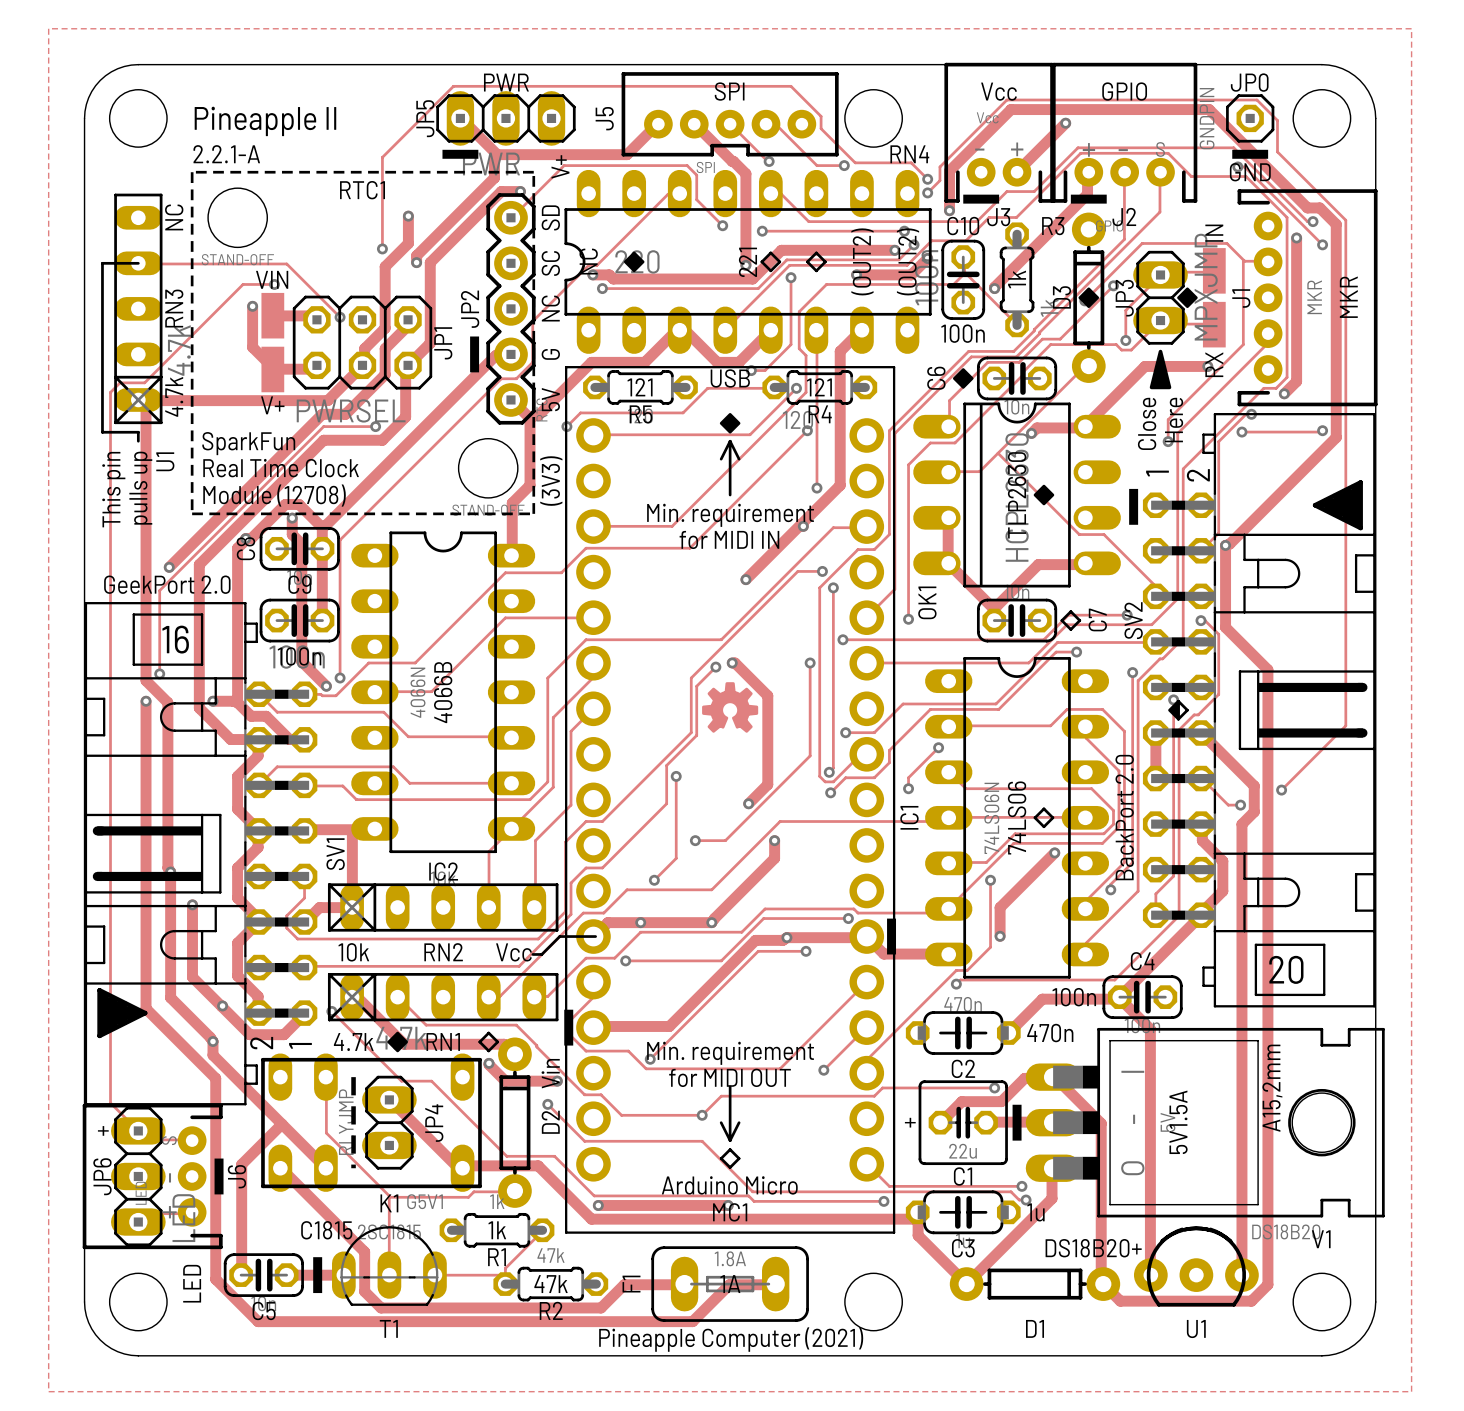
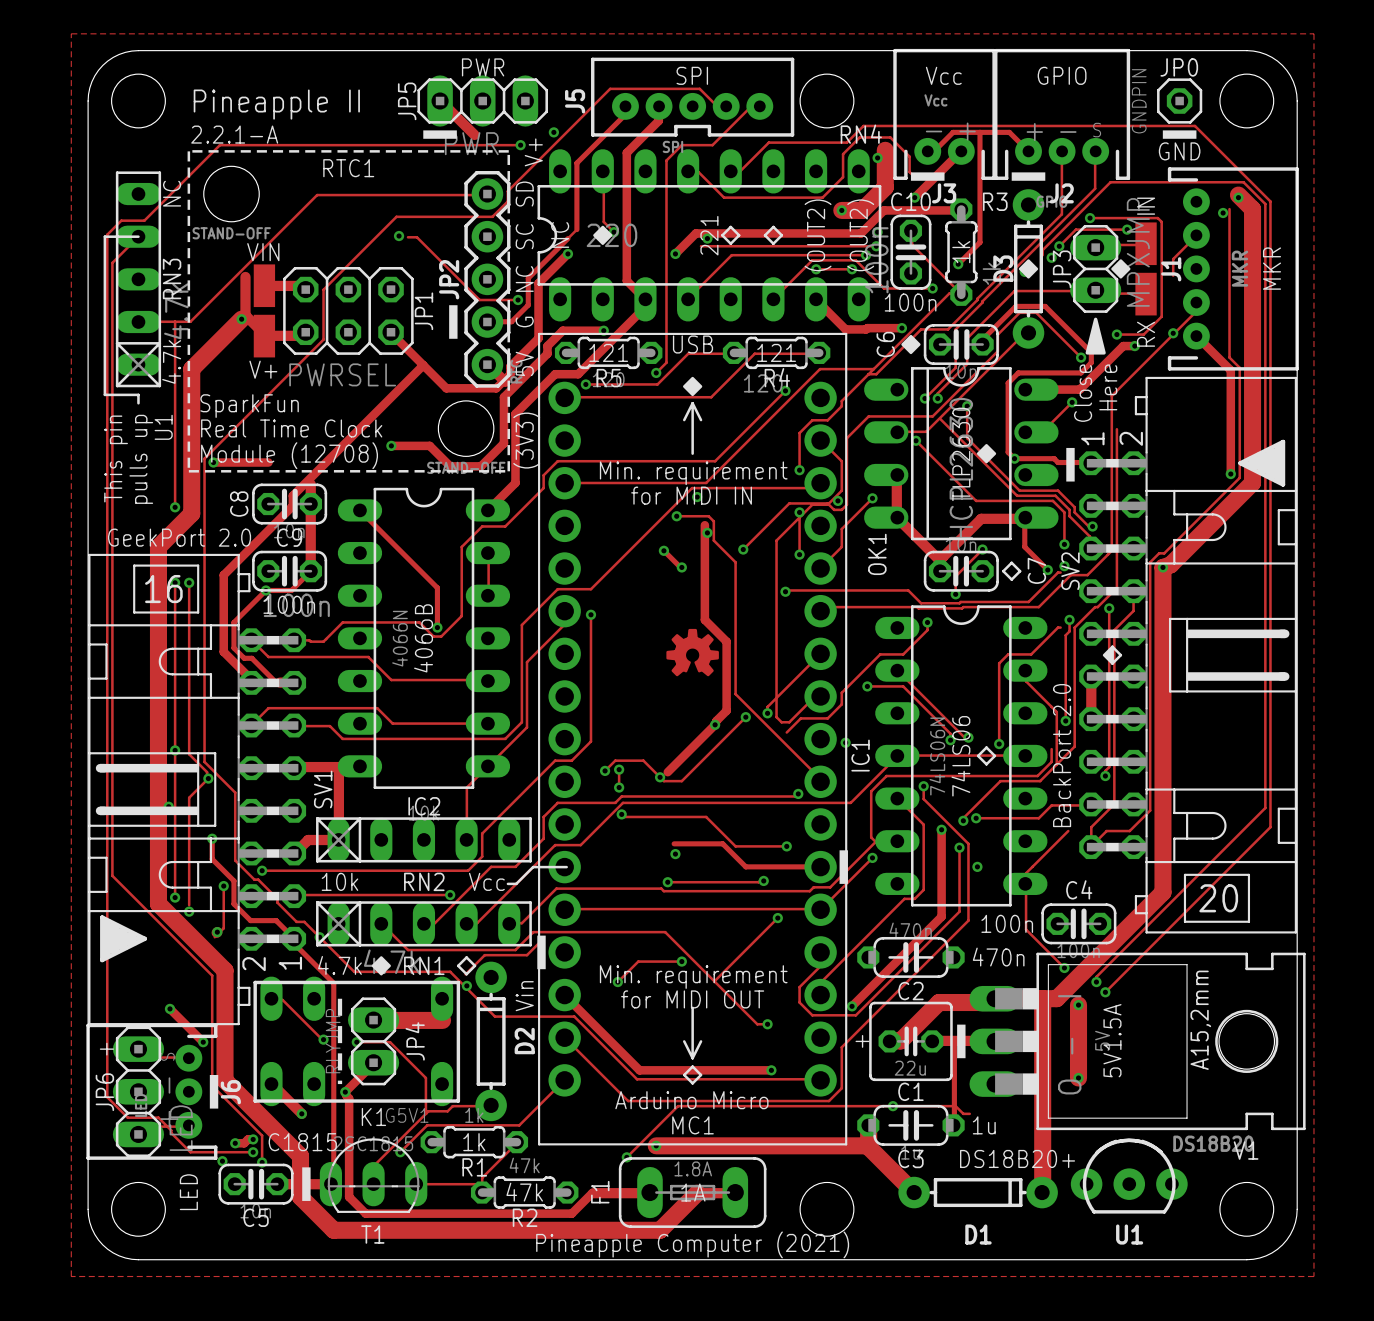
zone outline: (48, 28) (1411, 28) (1411, 1391) (48, 1391) (48, 28) -> (71, 33) (71, 1276) (1313, 1276) (1313, 33) (71, 33)
track: (1065, 123) (1017, 172) -> (914, 197) (961, 151)
via: (1065, 123) -> none
track: (657, 124) (627, 154) (497, 154) (494, 158) (494, 177) (416, 255) (416, 262) -> none
track: (694, 124) (745, 173) (745, 265) -> (659, 106) (658, 120) (626, 152) (626, 280) (645, 299) (643, 308) (578, 374) (555, 374) (552, 376)
track: (730, 124) (769, 161) -> none
track: (765, 124) (775, 124) (816, 165) (844, 165) -> (726, 106) (716, 105) (699, 88) (610, 88) (507, 191) (507, 201) (492, 216) (396, 216) (323, 289) (323, 339) (204, 458) (204, 761) (235, 792) (235, 860) (254, 879) (258, 879) (296, 921) (304, 921) (319, 937)
track: none -> (759, 106) (750, 106) (712, 145) (681, 145) (666, 160) (666, 362) (656, 372)
via: none -> (553, 132)
track: none -> (979, 132) (979, 242) (958, 264)
via: (769, 161) -> none
track: (855, 162) (821, 128) (821, 116) (791, 86) (453, 86) (382, 157) (382, 248) -> (809, 142) (768, 142) (740, 170) (730, 171)
track: (894, 162) (911, 162) (927, 179) -> (846, 142) (863, 125) (1194, 125) (1270, 201) (1270, 827) (1105, 992)
track: none -> (520, 145) (219, 145) (144, 220) (121, 220) (107, 234) (107, 1097) (127, 1117) (158, 1117) (190, 1152) (253, 1152)
via: none -> (520, 145)
via: (844, 165) -> none
track: (1237, 166) (1244, 166) (1322, 244) -> none
via: (1237, 166) -> none
track: none -> (885, 150) (885, 187) (862, 210) (841, 210)
track: (1088, 172) (1087, 194) (994, 288) -> (1028, 151) (1009, 132) (953, 132) (935, 150) (927, 151)
track: (520, 191) (501, 191) (430, 262) (430, 343) (408, 365) (405, 370) (405, 417) (382, 440) (323, 440) (199, 564) (199, 708) (230, 739) (259, 739) (258, 755) (237, 776) (237, 809) (259, 830) (258, 847) (237, 867) (237, 898) (256, 917) (259, 922) (237, 943) (237, 975) (258, 996) (259, 1013) -> none
via: (520, 191) -> none
track: (927, 192) (939, 180) (939, 166) (1006, 100) (1256, 100) (1277, 120) (1277, 151) (1345, 220) (1345, 725) (1281, 790) -> none
via: (927, 192) -> none
track: none -> (602, 171) (603, 221) (614, 232)
track: (679, 193) (668, 194) (606, 255) -> (624, 106) (624, 115) (576, 163) (576, 229)
track: (770, 193) (781, 194) (808, 221) -> (688, 171) (698, 172) (724, 197) (766, 197)
track: (949, 210) (949, 171) (1011, 109) (1209, 109) (1307, 207) (1319, 207) (1336, 224) (1336, 437) (1229, 544) (1225, 545) (1225, 627) (1267, 669) (1267, 1284) (1251, 1301) (1120, 1301) (1103, 1284) (1101, 1279) (1101, 1123) (1053, 1077) (1024, 1078) (1001, 1101) (961, 1101) (941, 1122) -> none
via position: (949, 210) -> (914, 197)
track: (408, 216) (408, 243) (385, 266) (385, 328) (364, 348) (364, 361) (361, 366) (327, 400) (138, 399) (146, 404) (146, 680) (167, 702) (167, 867) (170, 872) (170, 997) (210, 1037) (212, 1041) (212, 1055) (325, 1168) -> none
via: (408, 216) -> none
track: (510, 217) (564, 165) (687, 165) (696, 175) (696, 199) (722, 225) -> (487, 194) (317, 195) (190, 321) (138, 322)
track: none -> (1238, 195) (1252, 209) (1252, 482) (1170, 564) (1162, 567) (1162, 892) (1056, 998) (995, 998)
track: (868, 221) (976, 221) (1006, 191) (1034, 191) (1077, 147) (1233, 147) (1307, 221) (1313, 221) -> (822, 197) (843, 177) (843, 154) (859, 137) (890, 137) (909, 156) (909, 172) (916, 178)
via: (722, 225) -> none
track: (762, 231) (904, 231) -> none
via: (762, 231) -> none
via: (904, 231) -> none
via: none -> (841, 210)
track: (1296, 238) (1296, 381) (1284, 393) -> none
track: (1154, 243) (1142, 243) (1084, 300) -> none
via: none -> (1090, 218)
track: (914, 244) (898, 259) -> (961, 209) (884, 210) (860, 233) (850, 233)
via: (914, 244) -> none
via: (1322, 244) -> none
track: (1231, 247) (1244, 261) (1268, 261) -> (1161, 221) (1161, 316) (1143, 334) (1116, 334)
via: (382, 248) -> none
track: (894, 250) (781, 250) (752, 279) (613, 279) (609, 274) (592, 274) -> none
via: (894, 250) -> none
track: none -> (1127, 229) (1075, 229) (1059, 246)
via: none -> (1127, 229)
via: none -> (614, 232)
track: (927, 258) (911, 274) (856, 274) -> none
track: (786, 259) (758, 288) (602, 288) -> (745, 233) (695, 233) (675, 253)
track width: thin (786, 259) (898, 259) -> thick (745, 233) (850, 233)
track: (1244, 260) (1243, 287) -> (1196, 235) (1173, 259)
track: (138, 263) (286, 263) (340, 317) -> none
track: none -> (408, 237) (416, 237) (479, 300) (518, 300)
track: (596, 265) (588, 265) (532, 321) (532, 362) (516, 378) (501, 378) (340, 540) (340, 678) -> (567, 238) (528, 278) (528, 305) (511, 321) (487, 322)
track: (965, 272) (953, 284) (826, 284) (799, 311) (799, 348) (806, 355) (806, 392) (672, 526) -> (873, 369) (820, 369) (706, 482) (638, 482)
track: none -> (701, 246) (876, 246)
via: none -> (876, 246)
via: none -> (1059, 246)
via: (592, 274) -> none
via position: (856, 274) -> (816, 269)
track: (1160, 274) (1125, 310) (1125, 340) -> none
track: (791, 277) (791, 344) (765, 370) (751, 370) -> none
via: (791, 277) -> none
track: none -> (567, 253) (538, 283) (538, 338) (510, 366) (510, 374) (496, 388) (446, 388) (391, 332)
via: none -> (567, 253)
via: none -> (675, 253)
track: (771, 283) (789, 265) (907, 265) (931, 240) (965, 240) (989, 217) (1016, 217) (1080, 153) (1168, 153) (1191, 176) (1246, 176) (1287, 217) (1287, 377) (1276, 388) (1263, 388) (1183, 468) -> (731, 255) (866, 255)
via: none -> (866, 255)
track: none -> (1042, 255) (1042, 250) (1110, 182) (1243, 182) (1265, 204) (1265, 808) (1096, 976) (1096, 982)
track: (274, 284) (243, 284) (144, 382) (120, 382) (110, 392) -> (138, 236) (112, 262) (112, 357)
via: (274, 284) -> none
track: (1113, 285) (1060, 339) (1042, 339) (1019, 362) (1002, 362) -> (958, 319) (948, 329)
via: (602, 288) -> none
via: (994, 288) -> none
via: none -> (958, 264)
track: none -> (816, 269) (852, 269)
via: none -> (852, 269)
track: (1243, 304) (1243, 344) (1168, 419) (1168, 441) -> none
via: (252, 306) -> none
via: (340, 317) -> none
via: none -> (932, 288)
track: (407, 320) (407, 326) (385, 348) (385, 374) (345, 414) (322, 414) (169, 567) -> none
track: (1159, 321) (1131, 350) (1121, 350) (1116, 344) (1097, 344) -> (1095, 291) (1014, 291) (992, 312)
via: none -> (518, 300)
track: (770, 330) (739, 362) (717, 362) (685, 330) (679, 330) (674, 332) (644, 362) (591, 362) (538, 415) (530, 418) (530, 485) (512, 503) (512, 555) -> none
track: (816, 330) (816, 488) -> (773, 299) (812, 260) (855, 260) (884, 288) (932, 288)
track: (861, 330) (840, 351) (840, 485) (745, 579) -> (816, 299) (845, 329) (901, 328)
via: (1125, 340) -> none
track: (1050, 344) (1079, 344) -> none
track: none -> (1036, 312) (1081, 357)
via: none -> (241, 319)
track: (1013, 351) (968, 351) (889, 430) (889, 438) -> (846, 395) (841, 401)
track: none -> (175, 321) (175, 507)
track: (510, 354) (495, 355) (326, 524) (322, 527) (299, 504) (285, 504) (251, 538) (245, 538) (237, 548) (237, 702) -> none
track: (971, 356) (1016, 356) -> (918, 324) (949, 293) (961, 294)
track: none -> (960, 324) (955, 329) (955, 367) (924, 398)
via: none -> (901, 328)
track: (987, 362) (949, 400) (948, 426) -> (933, 329) (921, 329) (876, 374) (868, 374)
track: none -> (603, 330) (562, 330) (547, 346) (547, 353) (503, 397) (503, 443) (480, 466) (450, 466) (429, 445) (391, 445)
via: none -> (603, 330)
track: (1207, 366) (1144, 366) (1084, 427) (1036, 427) (1031, 433) -> none
via: (1207, 366) -> none
via: none -> (1173, 333)
via: none -> (1116, 334)
track: none -> (1196, 336) (1230, 370) (1230, 474)
via: (751, 370) -> none
track: (1023, 374) (955, 442) (930, 442) (918, 455) -> (1019, 312) (997, 334) (997, 351) (932, 416) (868, 416)
track: none -> (967, 340) (967, 363) (937, 393) (937, 398)
track: none -> (982, 344) (983, 338) (1015, 306) (1045, 306) (1091, 352) (1091, 362) (1081, 372) (1018, 372) (1008, 383) (1008, 452) (1014, 458) (1054, 458) (1058, 462) (1091, 463)
track: none -> (1134, 346) (1123, 346) (1079, 389) (1025, 389)
via: none -> (1134, 346)
track: none -> (819, 352) (754, 353)
track: (725, 388) (707, 388) (683, 412) (580, 412) -> (688, 353) (657, 384) (585, 384)
via: (796, 388) -> none
via: none -> (1081, 357)
via: (1284, 393) -> none
track: none -> (423, 365) (292, 495) (292, 506) (223, 575) (223, 651) (250, 678) (251, 682)
via: none -> (656, 372)
track width: thin (580, 412) (566, 426) -> thick (552, 376) (539, 389)
track: (1251, 414) (1246, 414) (1218, 441) (1218, 533) (1201, 550) -> none
via: (1251, 414) -> none
via: none -> (585, 384)
track: (375, 426) (323, 426) (159, 590) (159, 594) -> (241, 319) (191, 369) (191, 513) (158, 546)
via: (375, 426) -> none
track: none -> (539, 389) (515, 413) (515, 482) (487, 510)
via: (566, 426) -> none
track: (807, 430) (689, 548) (586, 548) (561, 572) (530, 572) -> (785, 390) (715, 461) (557, 461) (543, 475) (543, 488) (505, 526)
via position: (807, 430) -> (785, 390)
track: (1322, 430) (1241, 432) -> none
via: (1322, 430) -> none
via: (1241, 432) -> none
track: (894, 433) (894, 478) -> (859, 425) (846, 438)
via position: (1031, 433) -> (967, 406)
via: none -> (924, 398)
via: none -> (937, 398)
track: none -> (1072, 402) (1042, 431) (1025, 432)
via: none -> (1072, 402)
via: (1168, 441) -> none
track: (889, 444) (889, 503) -> (820, 440) (841, 461)
track: none -> (841, 406) (827, 420) (812, 420) (799, 433) (799, 470)
track: (998, 453) (1023, 478) -> (967, 406) (967, 438)
track: none -> (940, 419) (1017, 495) (1055, 495) (1069, 509) (1069, 516) (1090, 538)
track: (908, 464) (908, 619) -> none
track: none -> (916, 440) (976, 500) (1052, 500)
via: none -> (916, 440)
via: none -> (391, 445)
via: (816, 488) -> none
via: none -> (1014, 458)
track: none -> (213, 462) (268, 462)
via: none -> (213, 462)
via: none -> (799, 470)
via: none -> (1230, 474)
track: (292, 518) (292, 534) (301, 544) (301, 661) (326, 686) -> none
via: (292, 518) -> none
via: (803, 526) -> none
track: (866, 527) (833, 527) (721, 639) (621, 639) -> (820, 484) (816, 488) (692, 488) (590, 589)
track: (1103, 534) (1114, 545) -> (1042, 490) (1058, 490) (1074, 507) (1074, 512) (1088, 526) (1092, 526)
via: (245, 538) -> none
via: none -> (697, 497)
via: none -> (872, 498)
via: none -> (837, 500)
via: (1225, 545) -> none
track: (894, 549) (894, 589) (889, 594) -> (872, 498) (841, 529) (841, 546)
track: none -> (846, 504) (841, 509) (834, 509) (827, 503) (789, 503) (743, 549)
track: none -> (359, 510) (437, 587) (437, 627)
track: none -> (799, 512) (799, 554)
via: none -> (799, 512)
track: (1127, 557) (1154, 585) -> (1064, 512) (1064, 544)
track: none -> (676, 516) (708, 516) (713, 521) (713, 540) (735, 562) (735, 694) (820, 778) (820, 781)
via: none -> (676, 516)
track: none -> (1025, 517) (1024, 546) (1047, 570)
via position: (169, 567) -> (175, 507)
track: none -> (704, 525) (704, 619) (726, 641) (726, 710) (667, 772)
track: (822, 571) (797, 571) (691, 678) (691, 732) (621, 802) -> (590, 614) (590, 741)
via: (822, 571) -> none
via: none -> (1092, 526)
track: (833, 587) (833, 768) (829, 772) -> none
via: (833, 587) -> none
via: none -> (1064, 544)
track width: thin (159, 594) (159, 673) -> thick (158, 546) (158, 621)
track: (483, 594) (415, 662) (368, 662) (356, 675) -> (461, 546) (461, 616) (441, 636) (433, 636) (419, 622) (342, 622)
via: none -> (743, 549)
track: none -> (982, 549) (955, 576) (955, 594)
via: none -> (982, 549)
track: none -> (663, 550) (681, 567)
via: none -> (663, 550)
track: none -> (487, 553) (487, 595)
via: none -> (799, 554)
track: (1127, 615) (1068, 615) (1043, 639) (842, 639) -> none
via: none -> (681, 567)
via: none -> (1162, 567)
track: (593, 617) (505, 617) (431, 691) (374, 692) -> none
via: (908, 619) -> none
via: none -> (1047, 570)
track: (1200, 620) (1205, 620) (1218, 634) -> (1229, 209) (1229, 357) (1239, 367) (1239, 477) (1164, 553) (1159, 553) (1150, 562) (1150, 584)
via: (1200, 620) -> none
track: none -> (1060, 572) (1058, 572) (1028, 601) (921, 603) (908, 590) (785, 591)
track: (1134, 624) (1067, 624) (1028, 662) (867, 662) -> (1070, 575) (1038, 607) (825, 607) (821, 610)
track: none -> (175, 582) (175, 897)
via: none -> (175, 582)
track: none -> (189, 582) (189, 754) (207, 772) (208, 778) (189, 797) (189, 837)
via: none -> (189, 582)
via: (842, 639) -> none
via: none -> (265, 590)
track: (1155, 641) (1057, 642) (995, 703) (903, 703) (874, 732) (845, 732) -> none
via: none -> (785, 591)
via: none -> (955, 594)
track: (1076, 652) (1056, 652) (998, 709) (955, 709) -> (927, 622) (927, 630) (903, 654)
via: (1076, 652) -> none
track: none -> (1109, 608) (1109, 767) (1105, 770) (1105, 776)
via: none -> (1109, 608)
track: (732, 662) (734, 662) (767, 695) (767, 784) (748, 803) -> none
via: (732, 662) -> none
track: (810, 662) (810, 755) (725, 840) (695, 840) -> none
via: (810, 662) -> none
via: none -> (590, 614)
track: (715, 667) (696, 686) (696, 735) (666, 765) (666, 803) (647, 822) -> (745, 717) (681, 781) (663, 781) (643, 760) (615, 760)
via: (715, 667) -> none
via: (159, 673) -> none
via: none -> (927, 622)
via: (340, 678) -> none
via: none -> (437, 627)
track: (1132, 684) (1132, 862) (1110, 884) (1110, 889) -> (1069, 631) (1065, 635) (1065, 721)
via: (326, 686) -> none
track: (1218, 694) (1198, 714) (1194, 714) (1179, 729) (1179, 915) (1114, 980) (960, 980) (956, 984) -> (1150, 640) (1150, 810) (1129, 831) (1106, 831) (1091, 846)
track: (1173, 699) (1173, 876) -> (1133, 591) (1133, 610) (1114, 630) (1114, 804) (1107, 810)
via: (1173, 699) -> none
track: (146, 701) (146, 1008) (215, 1078) (215, 1279) (258, 1321) (692, 1321) (729, 1284) (734, 1284) -> (158, 621) (158, 903) (225, 970) (225, 1080) (300, 1156) (300, 1197) (333, 1230) (660, 1230) (697, 1193)
via: (146, 701) -> none
track: (212, 701) (237, 702) -> none
via: (212, 701) -> none
track: (237, 702) (251, 716) (266, 716) (289, 739) -> (310, 571) (291, 590) (265, 590) (233, 622) (233, 648) (244, 658) (251, 658) (276, 682) (280, 682)
track: (593, 708) (571, 731) (571, 805) (535, 840) (534, 907) -> none
track: none -> (820, 653) (767, 706) (767, 713)
track: (1091, 709) (1102, 709) (1124, 731) (1124, 862) (1086, 900) (1085, 908) -> (1031, 654) (1058, 627) (1060, 627)
track: (1057, 719) (1050, 725) (948, 726) -> (968, 737) (964, 737) (897, 670)
track: none -> (999, 663) (999, 744)
via: (845, 732) -> none
track: (1201, 732) (1254, 785) (1254, 811) (1241, 824) (1241, 1275) -> none
track: none -> (867, 686) (903, 686) (950, 733) (950, 740)
track: (938, 747) (908, 777) (908, 788) -> none
via position: (938, 747) -> (867, 686)
via: none -> (767, 713)
via: (829, 772) -> none
track: (948, 772) (965, 788) (1091, 788) (1113, 810) -> none
track: (676, 776) (676, 858) (654, 880) -> none
via: (676, 776) -> none
via: none -> (745, 717)
track: (1201, 778) (1228, 805) (1240, 805) -> none
via: none -> (1065, 721)
via position: (908, 788) -> (845, 742)
via: (1281, 790) -> none
via: (830, 792) -> none
via: none -> (968, 737)
via: none -> (950, 740)
via position: (748, 803) -> (715, 724)
via: none -> (999, 744)
via: (1240, 805) -> none
track: (1138, 807) (1138, 891) (1131, 898) -> (1074, 746) (1056, 764)
via: none -> (175, 750)
track: (602, 821) (586, 821) (565, 842) (565, 911) -> (543, 838) (538, 843)
track: none -> (573, 759) (555, 760) (482, 833) (482, 856) (468, 870) (262, 870)
track: (945, 821) (780, 821) (711, 889) (627, 889) (603, 913) -> (894, 759) (850, 802) (622, 802) (580, 845) (574, 845)
track: (1201, 824) (1202, 840) (1222, 861) (1222, 891) (1119, 997) -> none
track: none -> (619, 769) (619, 787)
via: none -> (619, 769)
track: (636, 833) (602, 867) -> (798, 793) (795, 796) (621, 796) (615, 802) (573, 802)
via: none -> (605, 770)
track: (1103, 833) (1015, 833) (986, 862) (948, 863) -> (1042, 770) (1037, 776) (886, 776) (871, 791) (871, 837) (875, 841)
via: none -> (1105, 776)
track: (774, 840) (774, 858) (711, 922) (607, 922) (593, 936) -> none
via: (774, 840) -> none
via: none -> (208, 778)
track: (1102, 843) (1013, 843) (948, 908) -> (1041, 779) (1000, 781) (963, 818) (963, 820)
track: none -> (923, 786) (923, 799) (968, 843) (968, 920) (841, 1047) (841, 1088) (828, 1101) (628, 1101) (564, 1037)
via: none -> (923, 786)
via: none -> (619, 787)
track: (1054, 852) (1000, 907) (1000, 936) -> none
via: (1054, 852) -> none
via: none -> (798, 793)
track: none -> (1091, 804) (1051, 805) (1038, 818) (976, 818)
track: (304, 876) (304, 898) (286, 915) (286, 928) (297, 939) (538, 939) (540, 936) -> (423, 923) (434, 923) (491, 866) (515, 866)
track: (990, 880) (990, 947) (976, 960) -> (897, 798) (923, 824) (923, 889)
via: (990, 880) -> none
track: none -> (621, 816) (706, 816) (735, 846) (786, 846)
via: none -> (976, 818)
via: none -> (963, 820)
via: (1110, 889) -> none
track: none -> (941, 829) (941, 916) (852, 1006)
via: none -> (941, 829)
track width: thick (192, 904) (192, 977) -> thin (189, 837) (189, 905)
via position: (192, 904) -> (212, 838)
track: (571, 906) (571, 914) (519, 966) (471, 966) -> none
track: (948, 908) (944, 913) (857, 913) (853, 908) (765, 908) (741, 932) (640, 932) (614, 958) (584, 959) -> (896, 841) (876, 841) (830, 887) (813, 887) (809, 891) (556, 888)
track: none -> (674, 843) (722, 843) (745, 866) (820, 867)
via: none -> (959, 847)
track: (848, 918) (763, 918) (721, 960) (625, 960) -> none
via position: (848, 918) -> (786, 846)
via: (640, 922) -> none
via: none -> (872, 857)
via: (1000, 936) -> none
via: none -> (977, 866)
via: (786, 937) -> none
via: none -> (262, 870)
track: (110, 945) (110, 1103) (138, 1130) -> (112, 875) (212, 975) (212, 1085) (262, 1135) (262, 1162)
track: none -> (763, 877) (758, 882) (667, 882)
track: (806, 951) (758, 951) (672, 1037) -> (681, 961) (638, 961)
via: none -> (667, 882)
track: (948, 954) (883, 954) (866, 936) (786, 937) (782, 940) (755, 940) (669, 1026) (593, 1027) -> none
track: none -> (1025, 883) (1026, 929) (1064, 967)
track: none -> (223, 886) (223, 928) (214, 937)
via: none -> (223, 886)
via: (625, 960) -> none
via: none -> (450, 895)
via: none -> (175, 897)
track: (192, 977) (249, 1034) (284, 1034) (304, 1013) -> (212, 838) (212, 859) (233, 880) (233, 903) (250, 920) (276, 920) (294, 938)
track: (593, 982) (592, 997) (571, 1019) (571, 1036) (586, 1051) (628, 1051) (646, 1068) (780, 1068) (866, 982) -> (564, 909) (820, 909) (872, 857)
via: none -> (189, 911)
via: (956, 984) -> none
track: none -> (777, 918) (714, 981)
via: none -> (777, 918)
track: (352, 997) (357, 997) (404, 1044) (504, 1044) (514, 1054) -> none
track: (1119, 997) (1114, 999) (1042, 999) (1008, 1033) -> none
track: (1119, 997) (1150, 1029) (1150, 1275) -> none
track: none -> (294, 938) (295, 944) (333, 983) (333, 1180) (330, 1184)
track: none -> (541, 941) (527, 955) (484, 955) (465, 974)
track: (516, 1025) (584, 1094) (601, 1094) (621, 1115) (702, 1115) (721, 1096) (874, 1096) (882, 1087) (994, 1087) -> (492, 950) (515, 950) (533, 932) (665, 932) (757, 1024) (767, 1024)
track: (866, 1027) (823, 1070) -> (820, 952) (820, 966) (799, 987) (799, 1002) (812, 1015) (855, 1015) (959, 911) (959, 847)
via: none -> (681, 961)
via: (212, 1041) -> none
via: none -> (1064, 967)
track: (368, 1048) (401, 1081) (431, 1081) (506, 1156) (554, 1156) (594, 1195) (748, 1195) (754, 1201) (883, 1201) -> (354, 971) (450, 971) (495, 1016) (574, 1016) (637, 1079) (820, 1080)
via: none -> (1096, 982)
track: (489, 1063) (505, 1081) (557, 1081) -> none
via position: (823, 1070) -> (767, 1024)
via: none -> (1105, 992)
track: none -> (564, 995) (639, 1070) (771, 1070)
track: none -> (271, 998) (282, 999) (323, 1039)
track: (325, 1077) (326, 1133) (389, 1195) (389, 1275) -> none
track: none -> (995, 998) (987, 1002) (939, 1002) (900, 1040) (889, 1041)
track: none -> (1042, 998) (1042, 1192)
via: (557, 1081) -> none
track: none -> (1078, 1005) (1078, 1078)
via: none -> (1078, 1005)
via: none -> (852, 1006)
track: none -> (169, 1008) (203, 1042)
via: none -> (169, 1008)
via: (994, 1087) -> none
track: (390, 1100) (457, 1167) (538, 1165) (591, 1219) (914, 1219) (917, 1212) -> (374, 1020) (442, 1020)
track: (547, 1104) (584, 1141) (702, 1141) (752, 1191) -> (626, 1157) (678, 1106) (713, 1106)
via: (547, 1104) -> none
via: (702, 1115) -> none
via: none -> (323, 1039)
track: none -> (954, 1040) (953, 1125)
via: none -> (203, 1042)
track: none -> (356, 1042) (390, 1042) (425, 1078) (426, 1113)
via: none -> (356, 1042)
track: (282, 1124) (241, 1164) (241, 1275) -> none
via: none -> (771, 1070)
via: none -> (1078, 1078)
track: none -> (564, 1080) (519, 1125) (427, 1125) (400, 1152)
track: (866, 1164) (889, 1186) (1021, 1186) -> none
track: (1053, 1168) (1052, 1198) (966, 1284) -> none
via: none -> (345, 1092)
via: (1021, 1186) -> none
via: none -> (892, 1106)
track: (389, 1197) (448, 1197) -> (373, 1184) (374, 1165) (428, 1111)
track: (312, 1200) (364, 1251) (364, 1291) (381, 1307) (601, 1307) (624, 1284) -> (373, 1062) (345, 1092) (349, 1098) (349, 1197) (365, 1213) (571, 1213) (593, 1193)
via: none -> (301, 1113)
via: (1026, 1200) -> none
via: (883, 1201) -> none
track: (598, 1205) (728, 1205) -> none
via: (598, 1205) -> none
via: (728, 1205) -> none
track width: thin (917, 1212) (918, 1235) (966, 1284) -> thick (868, 1125) (868, 1147) (914, 1192)
track: none -> (253, 1139) (248, 1139) (244, 1143) (235, 1143)
via: none -> (253, 1139)
via: none -> (235, 1143)
track: none -> (656, 1145) (868, 1145)
via: none -> (656, 1145)
via: none -> (253, 1152)
via: none -> (400, 1152)
via: none -> (626, 1157)
via: none -> (222, 1161)
via: none -> (262, 1162)

